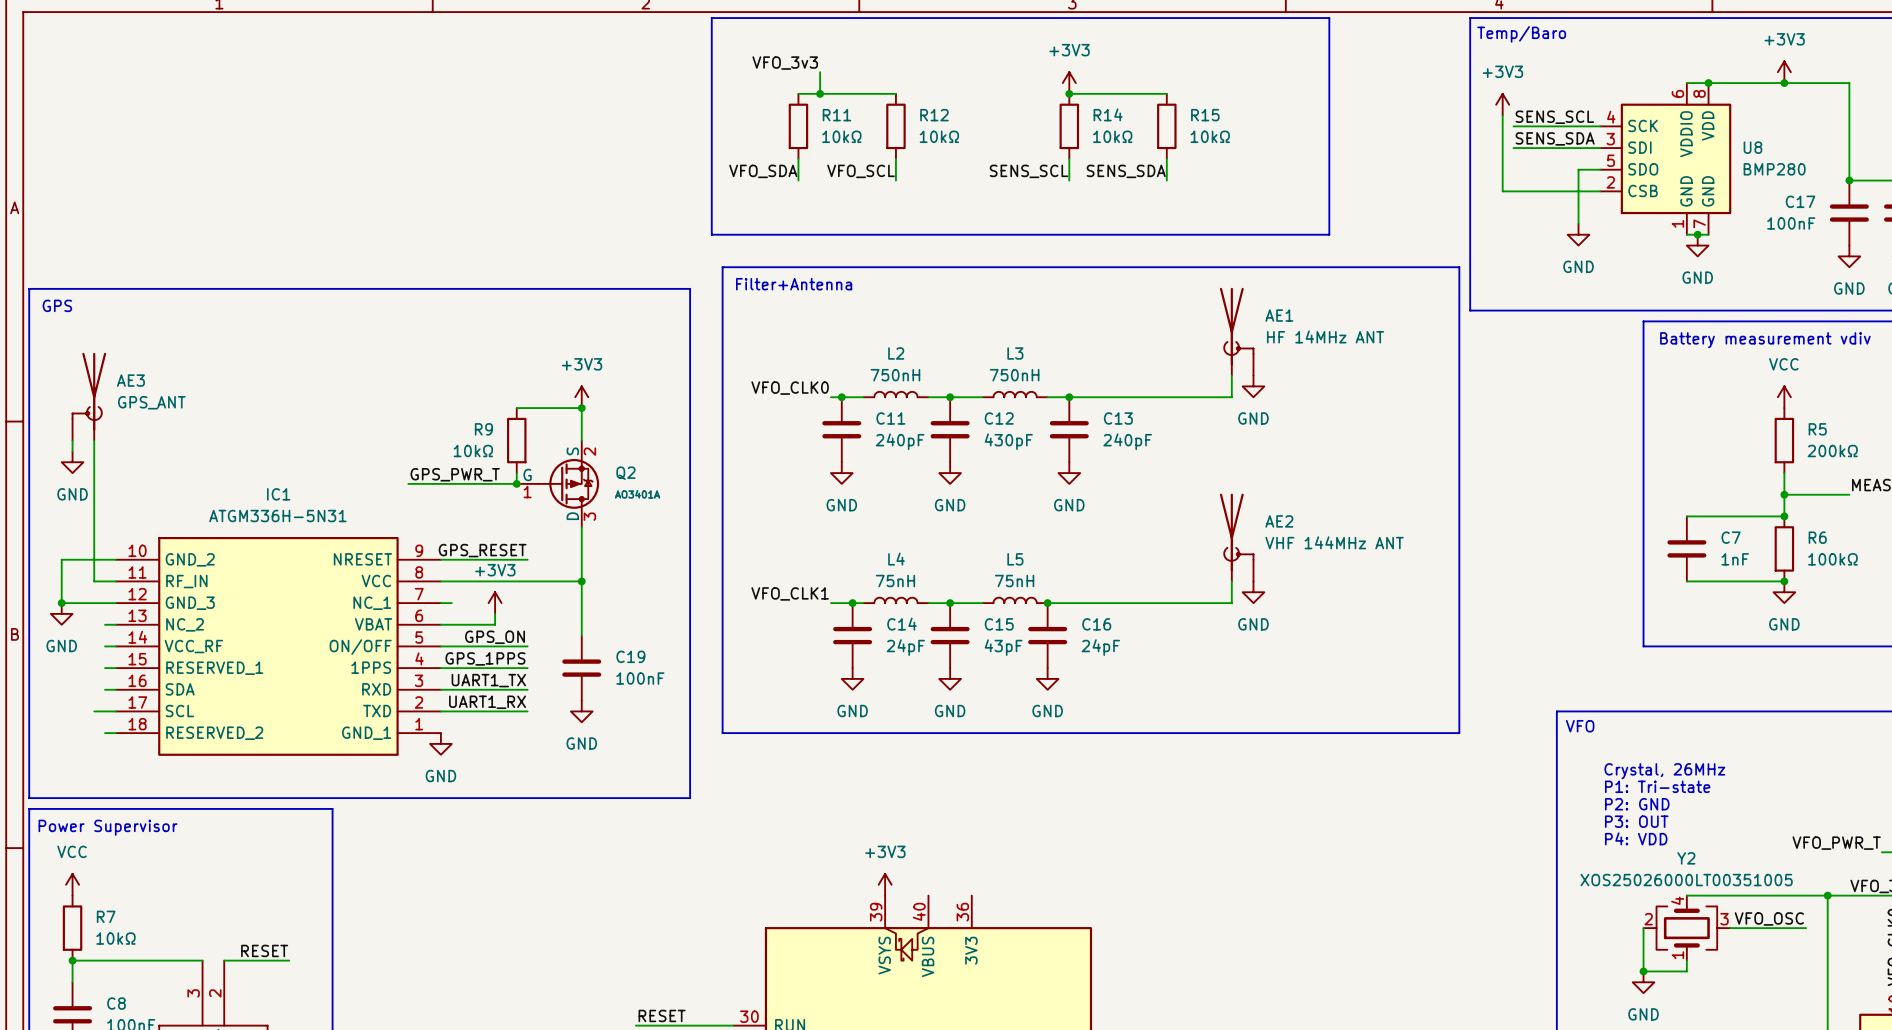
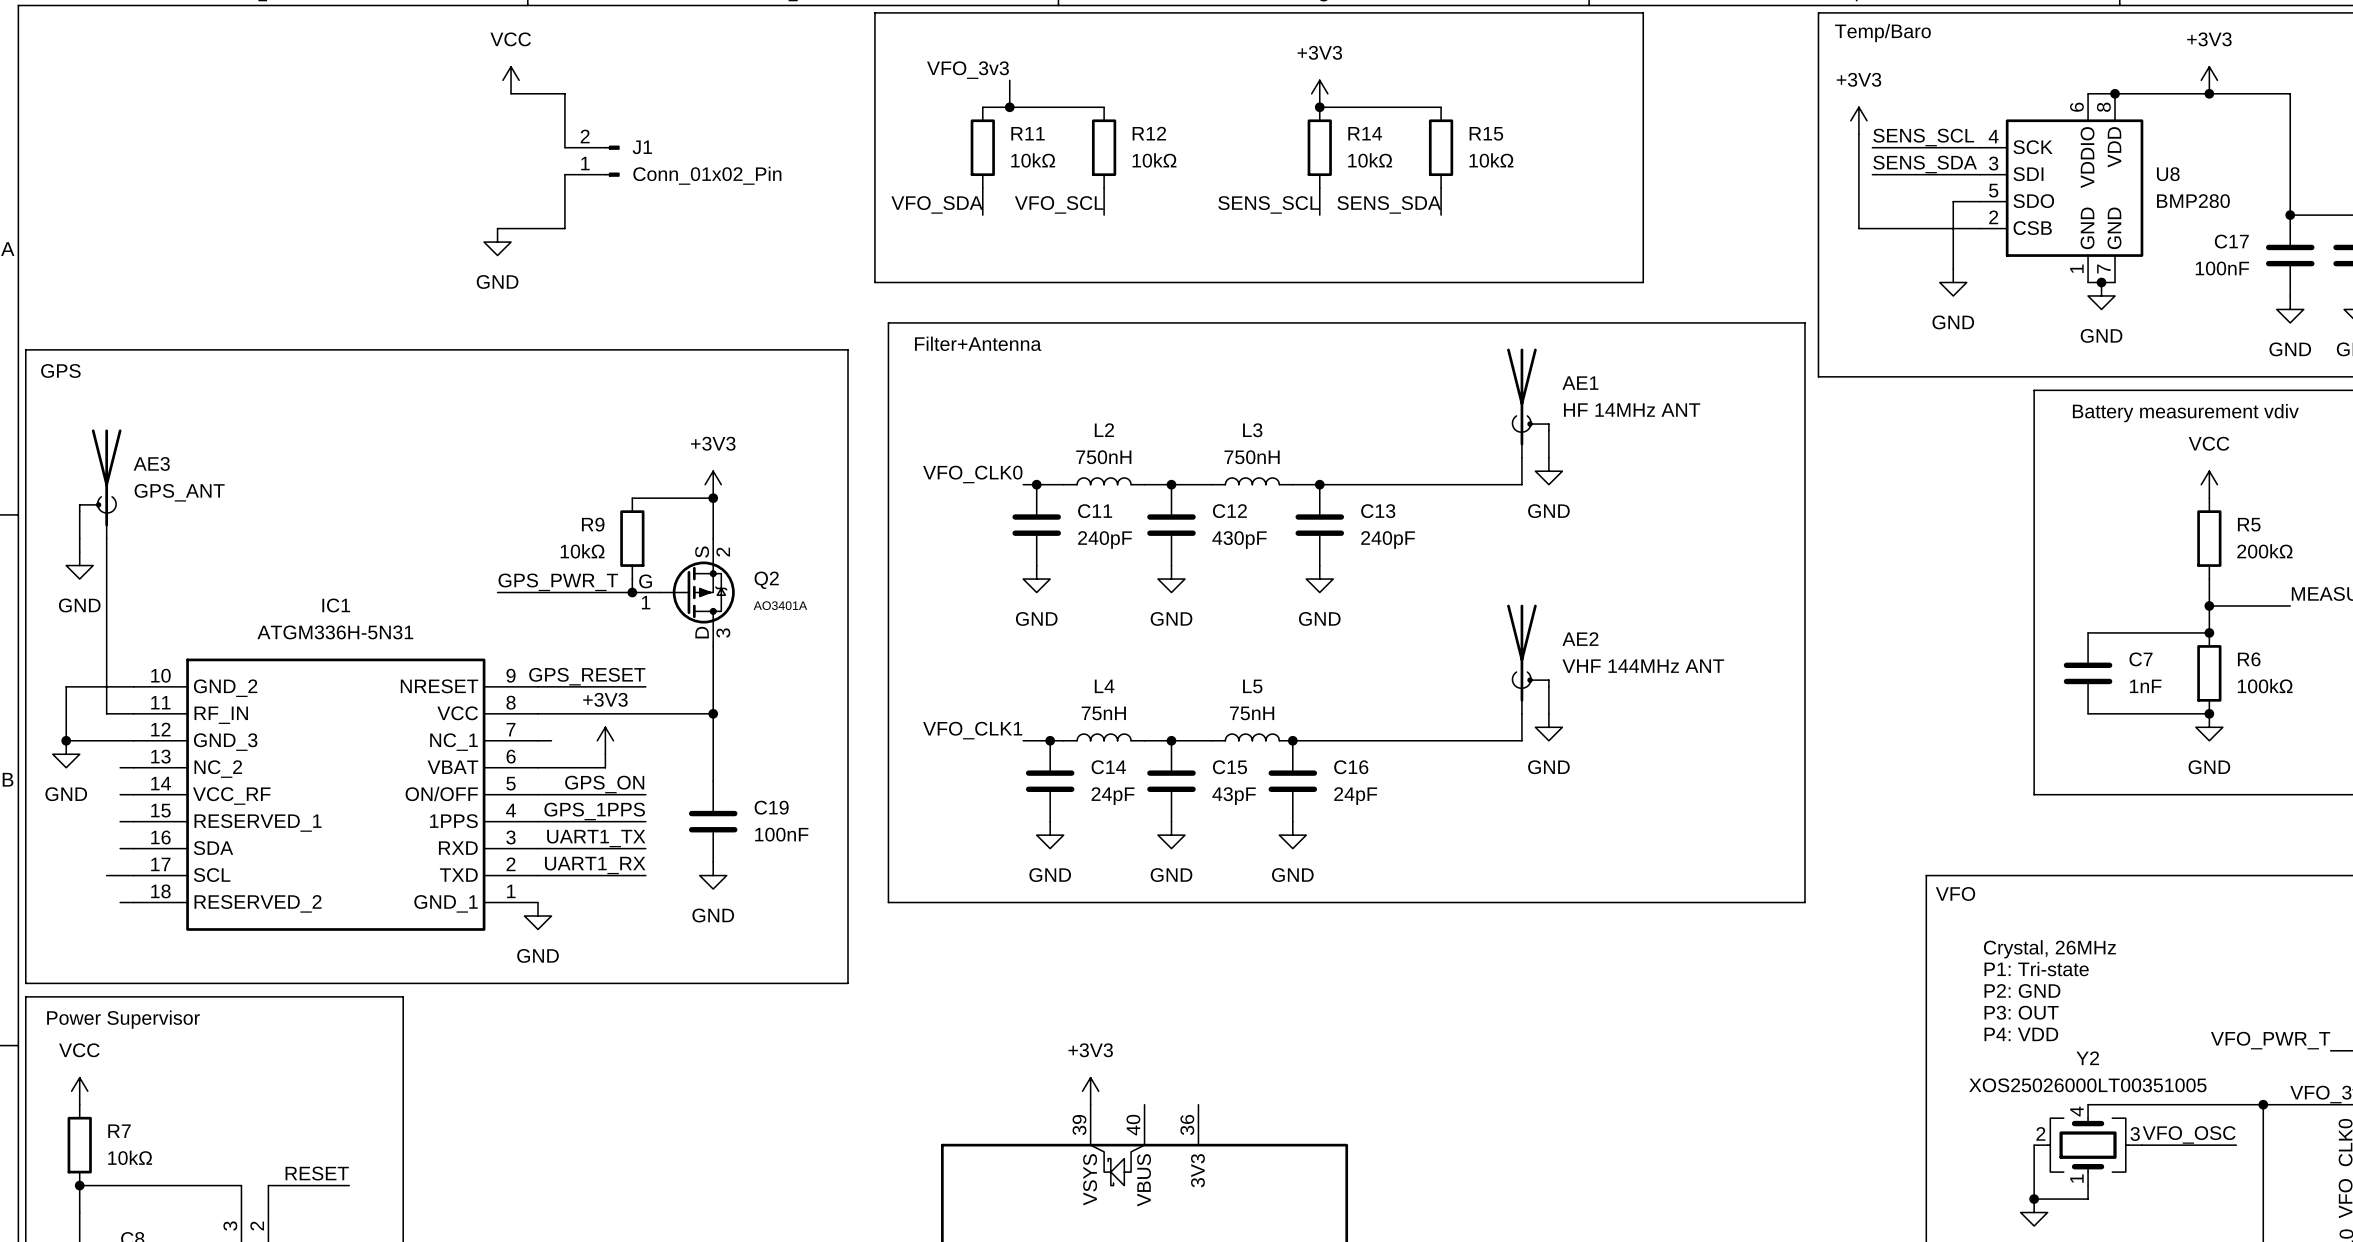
power symbol: none -> VCC (511, 80)
wire: none -> (511, 93) (564, 93) (564, 147)
J1: none -> Conn_01x02_Pin (592, 161)
wire: none -> (564, 174) (564, 228) (497, 228)
power symbol: none -> GND (497, 242)

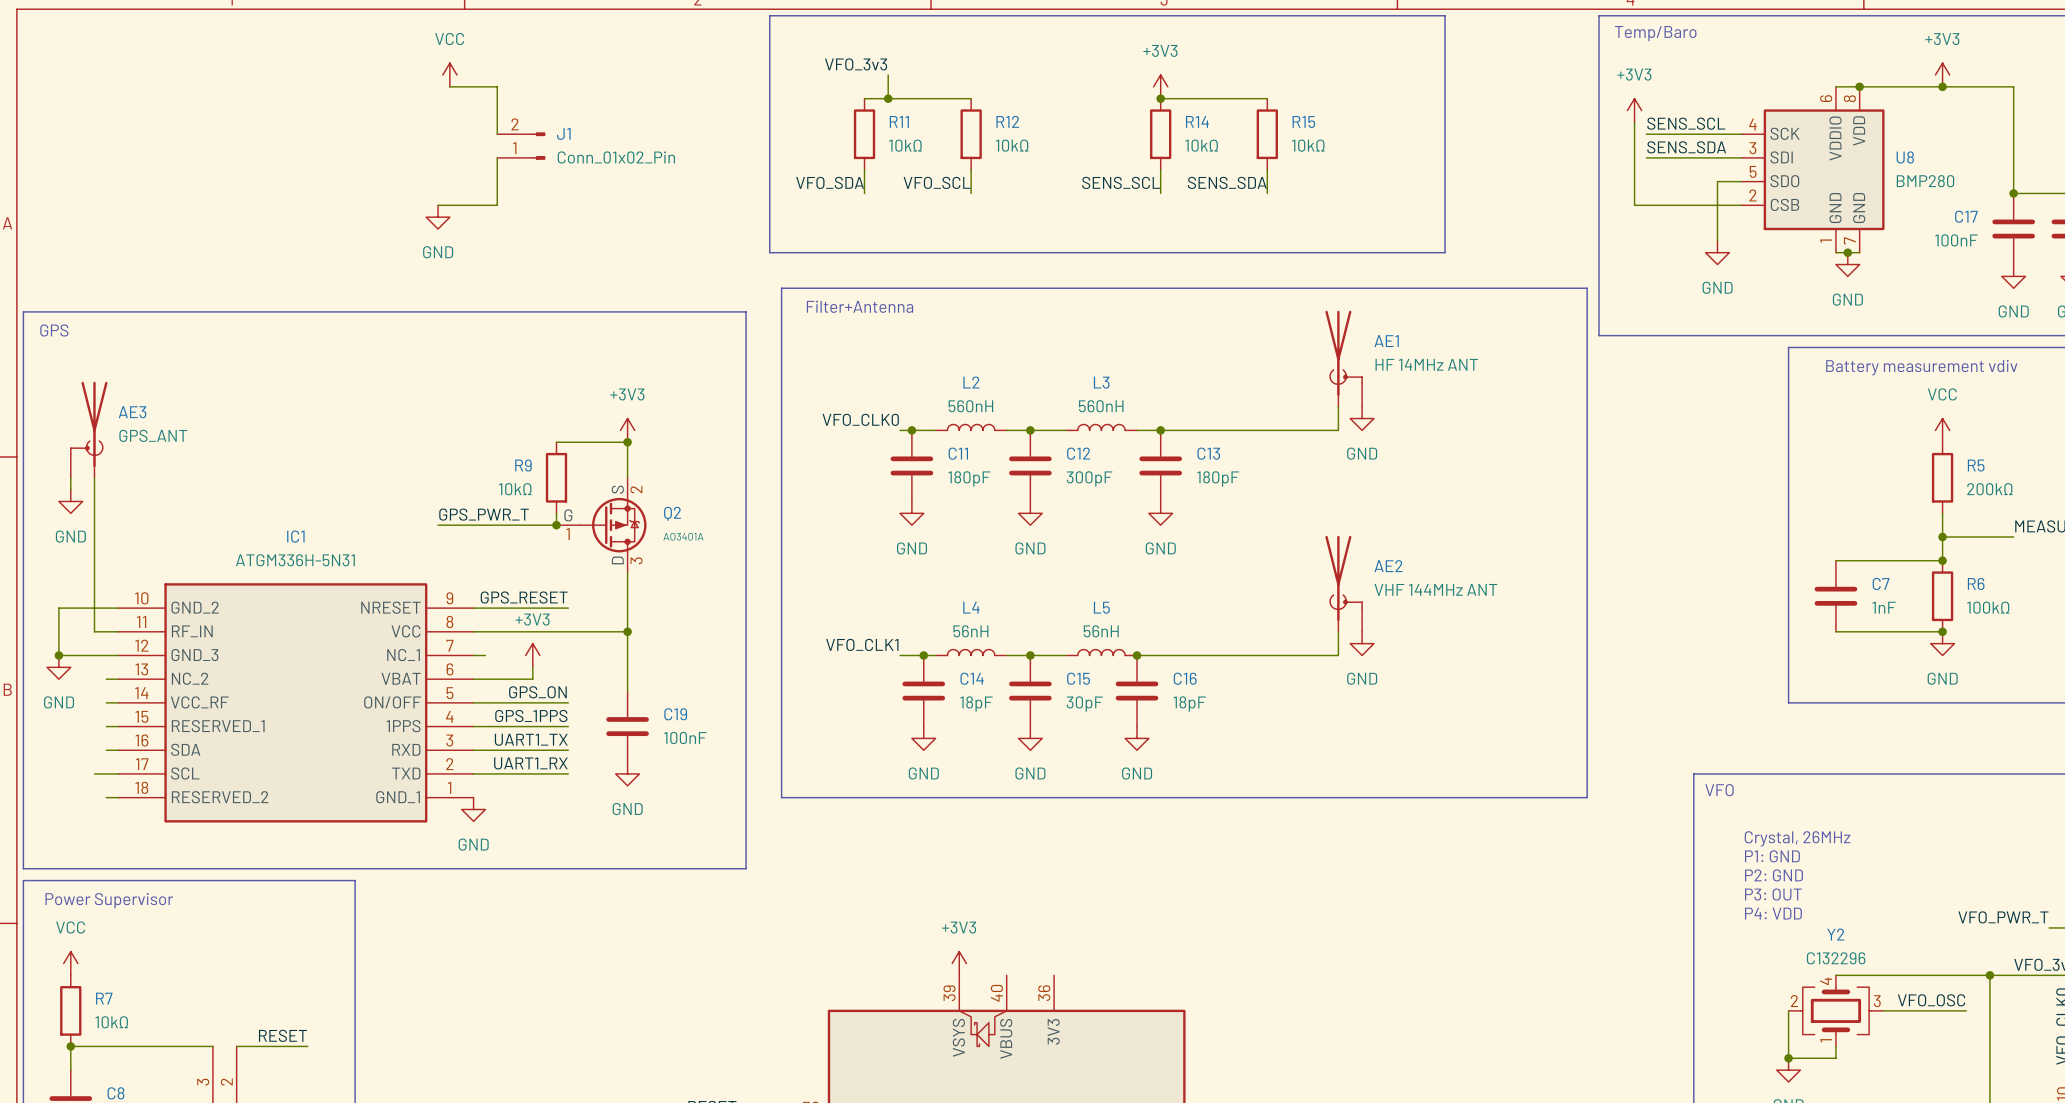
L2 value: 750nH (1103, 457) -> 560nH (970, 406)
L3 value: 750nH (1252, 457) -> 560nH (1101, 406)
C11 value: 240pF (1105, 540) -> 180pF (969, 478)
C12 value: 430pF (1239, 540) -> 300pF (1089, 478)
C13 value: 240pF (1388, 540) -> 180pF (1218, 478)
L4 value: 75nH (1103, 713) -> 56nH (970, 631)
L5 value: 75nH (1252, 713) -> 56nH (1101, 631)
C14 value: 24pF (1113, 796) -> 18pF (976, 703)
C15 value: 43pF (1234, 796) -> 30pF (1084, 703)
C16 value: 24pF (1355, 796) -> 18pF (1189, 703)
text: P1: Tri-state (2036, 969) -> P1: GND (1772, 856)
Y2 value: XOS25026000LT00351005 (2087, 1085) -> C132296 (1836, 958)

